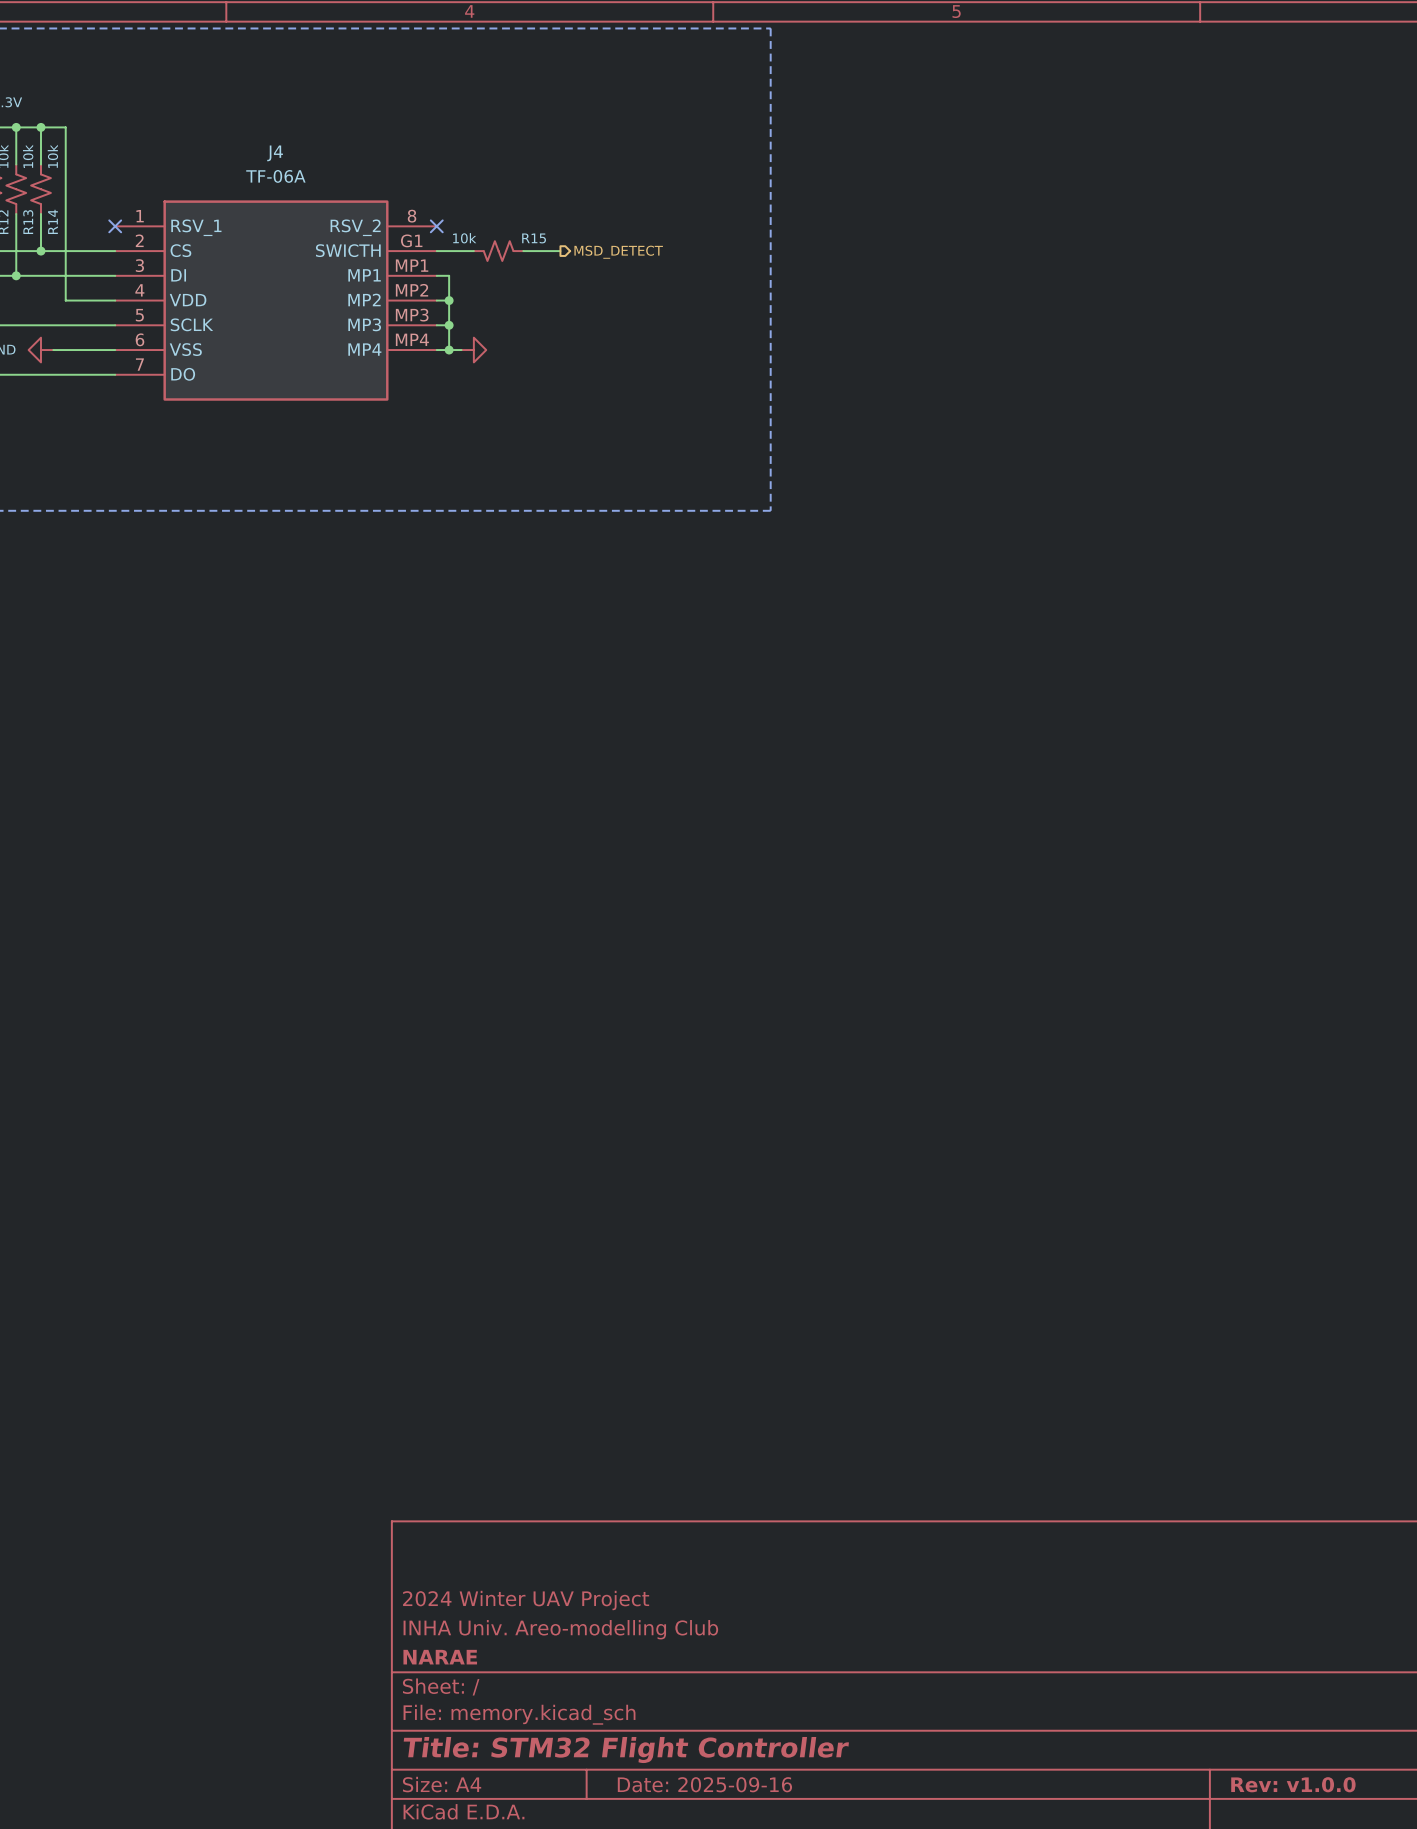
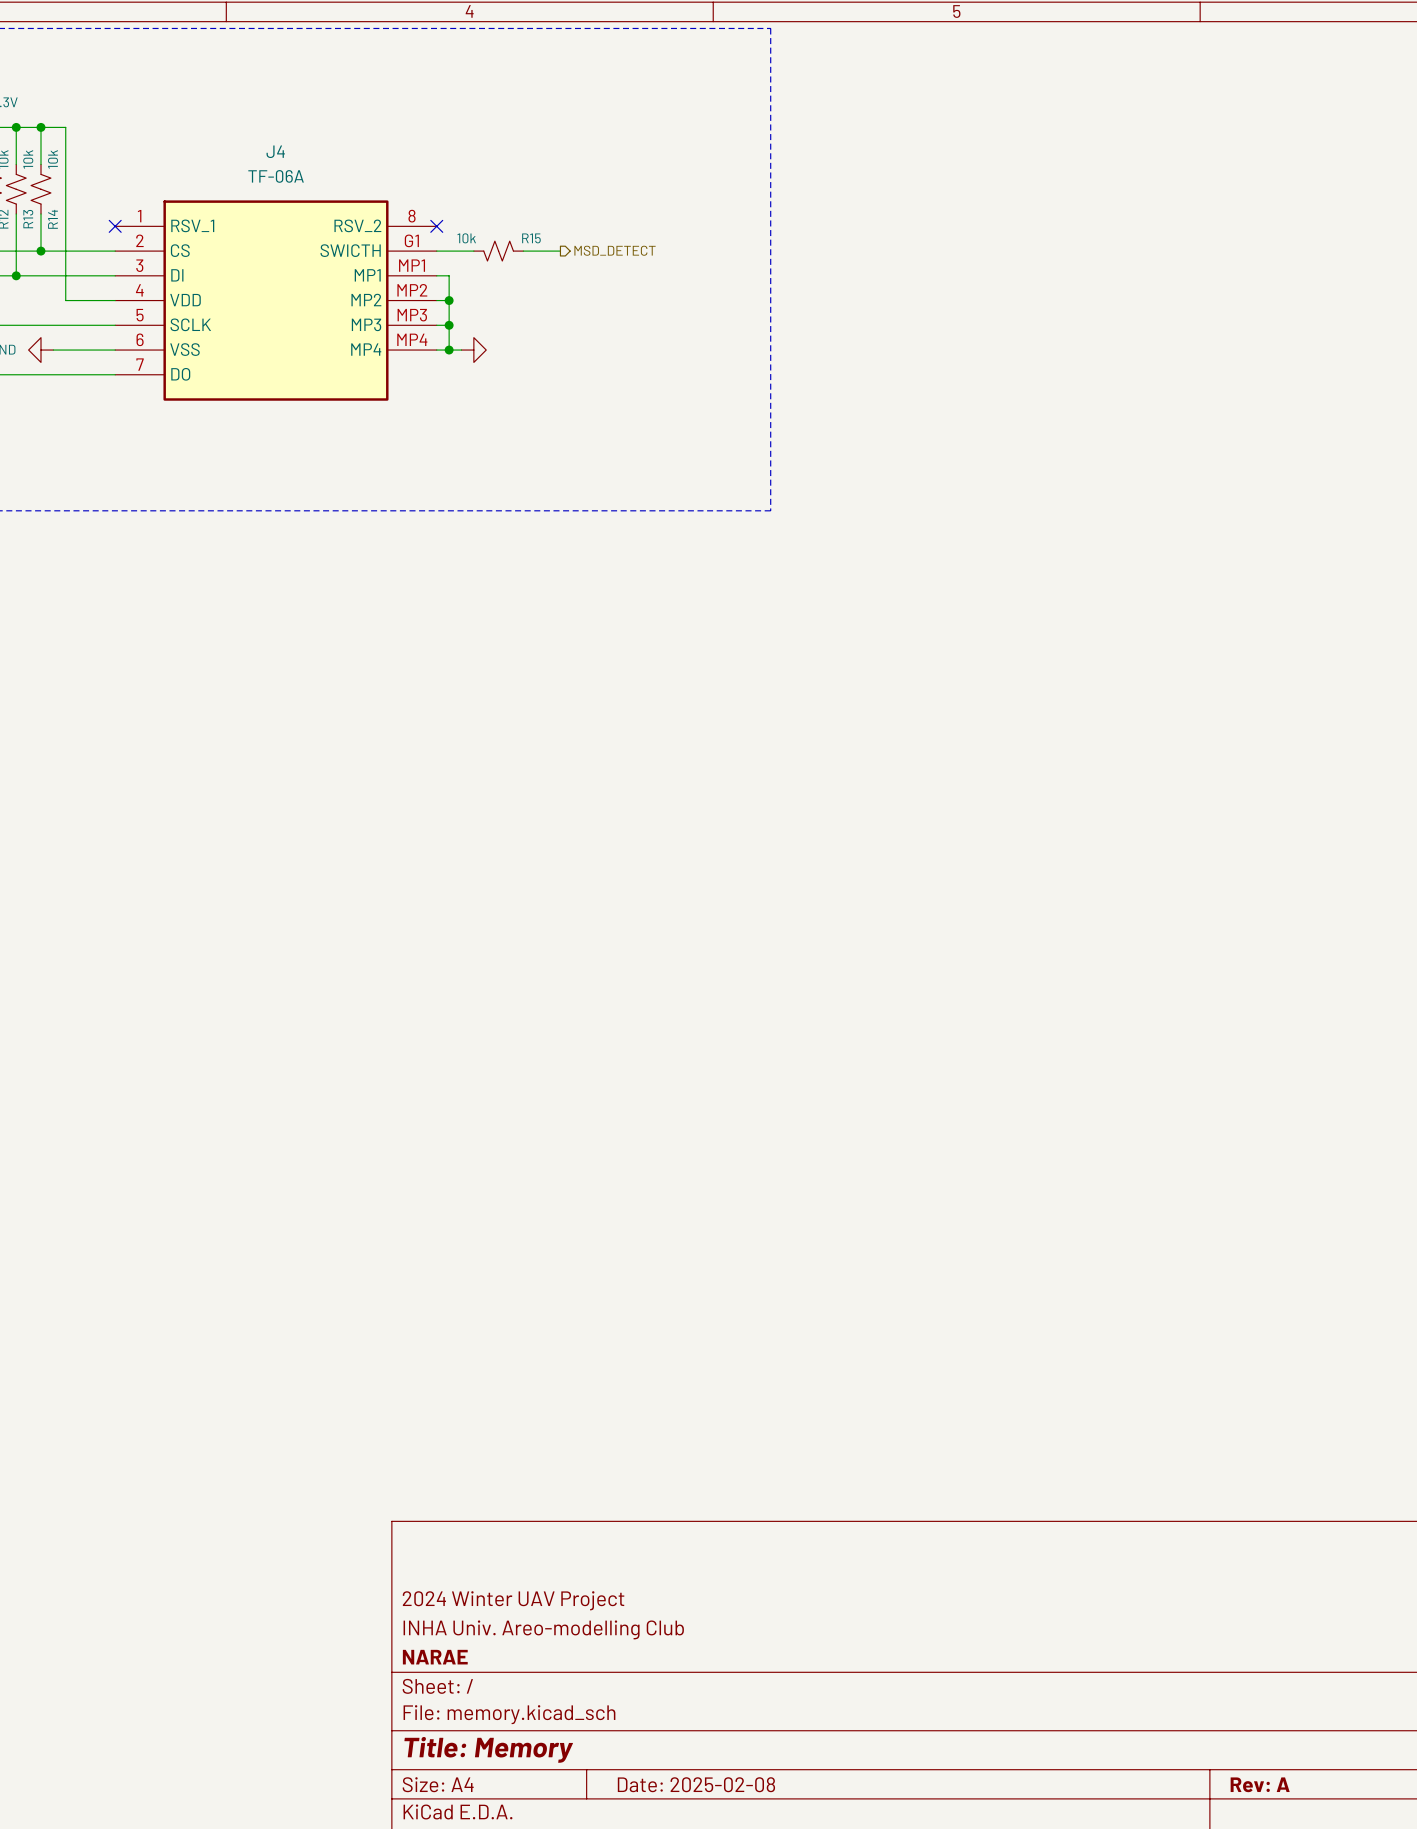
title block: Title: STM32 Flight Controller (626, 1750) -> Title: Memory (488, 1749)
title block: Date: 2025-09-16 (704, 1784) -> Date: 2025-02-08 (696, 1784)
title block: Rev: v1.0.0 (1293, 1784) -> Rev: A (1260, 1784)

